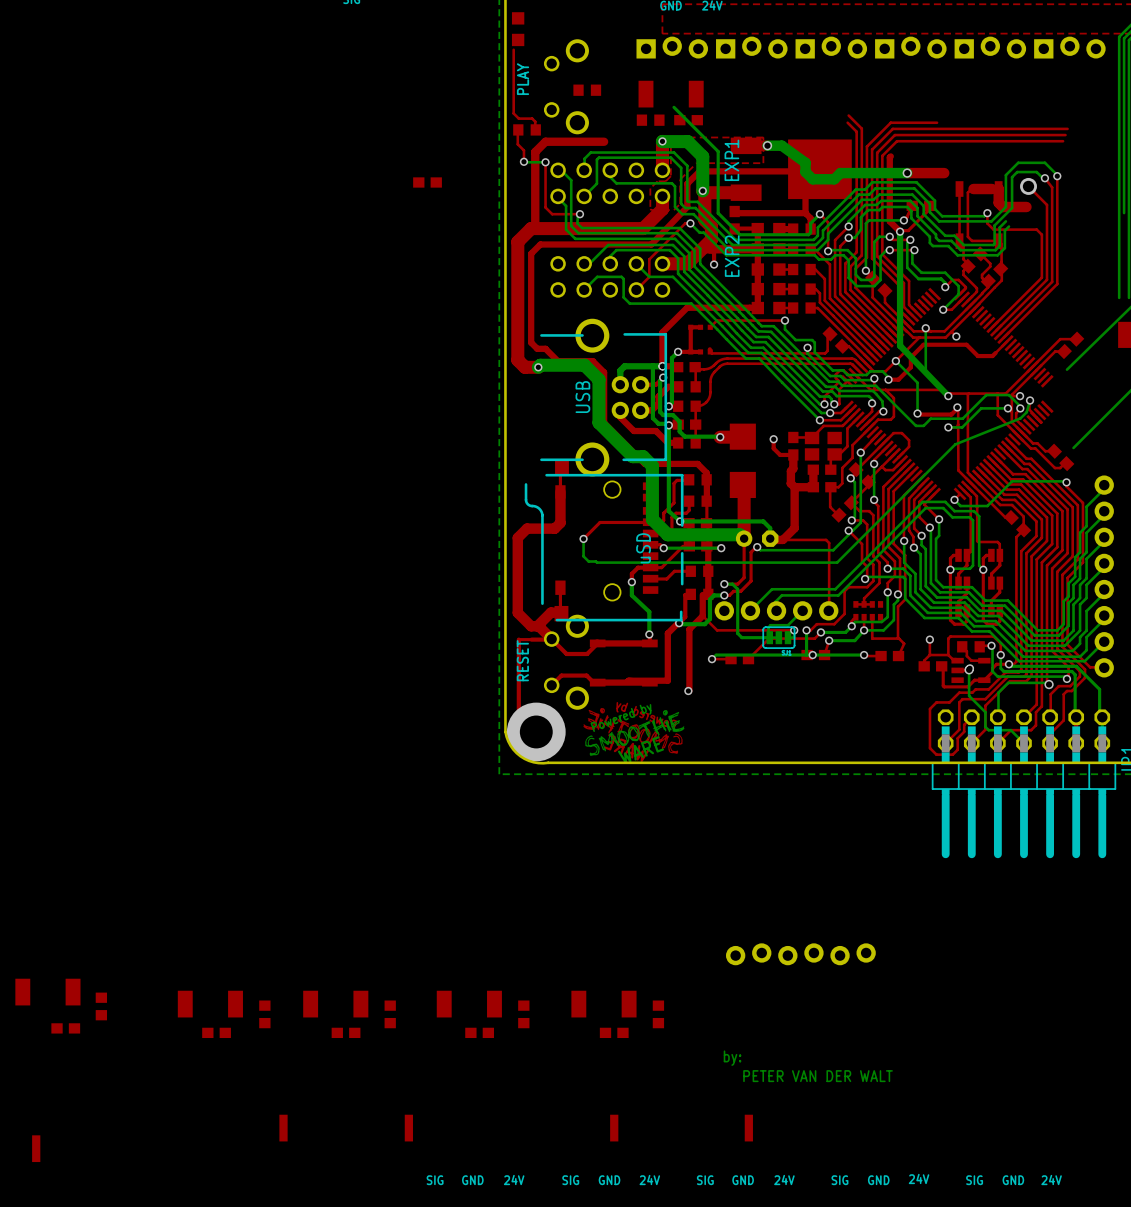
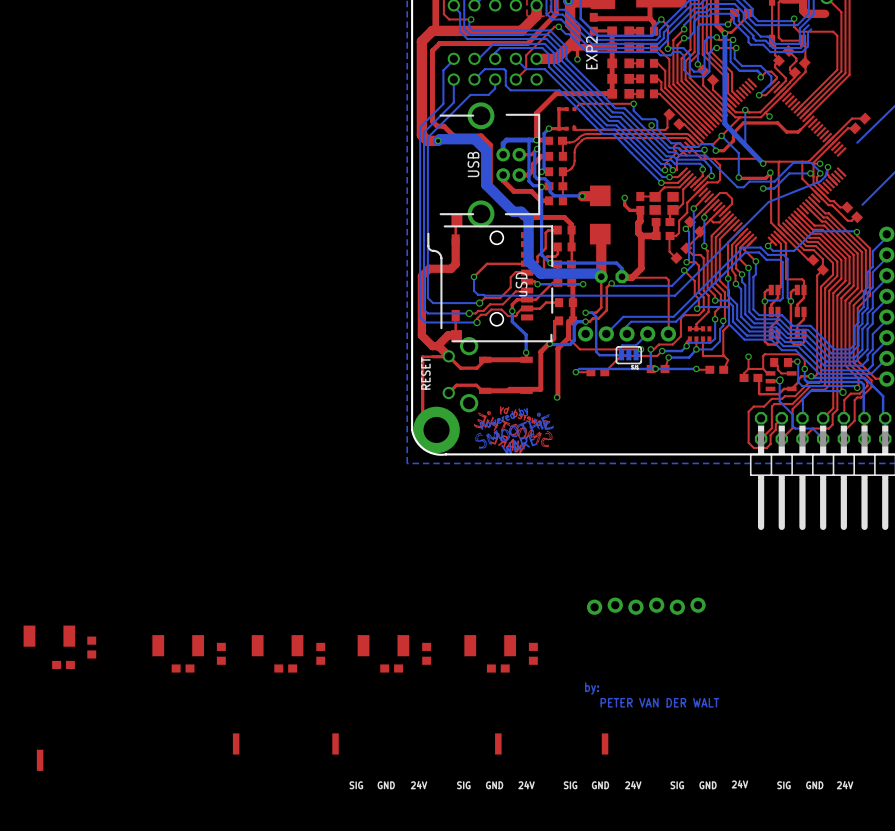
bottom track: none -> (453, 58) (443, 70) (443, 103) (420, 127) (420, 317) (425, 322) (477, 322)
bottom track: none -> (453, 79) (453, 102) (424, 132) (424, 309) (427, 313) (469, 313)
bottom track: none -> (495, 79) (495, 88) (488, 94) (470, 94) (427, 137) (427, 297) (433, 303) (479, 303)
top track: none -> (527, 272) (515, 272) (510, 277) (510, 287) (500, 297) (484, 297) (479, 303)
top track: none -> (527, 290) (515, 291) (502, 304) (489, 304) (483, 310) (469, 313)
via: none -> (479, 303)
top track: none -> (527, 308) (521, 309) (515, 316) (508, 316) (501, 309) (491, 309) (486, 314) (480, 314) (477, 318) (477, 322)
via: none -> (469, 313)
via: none -> (477, 322)

